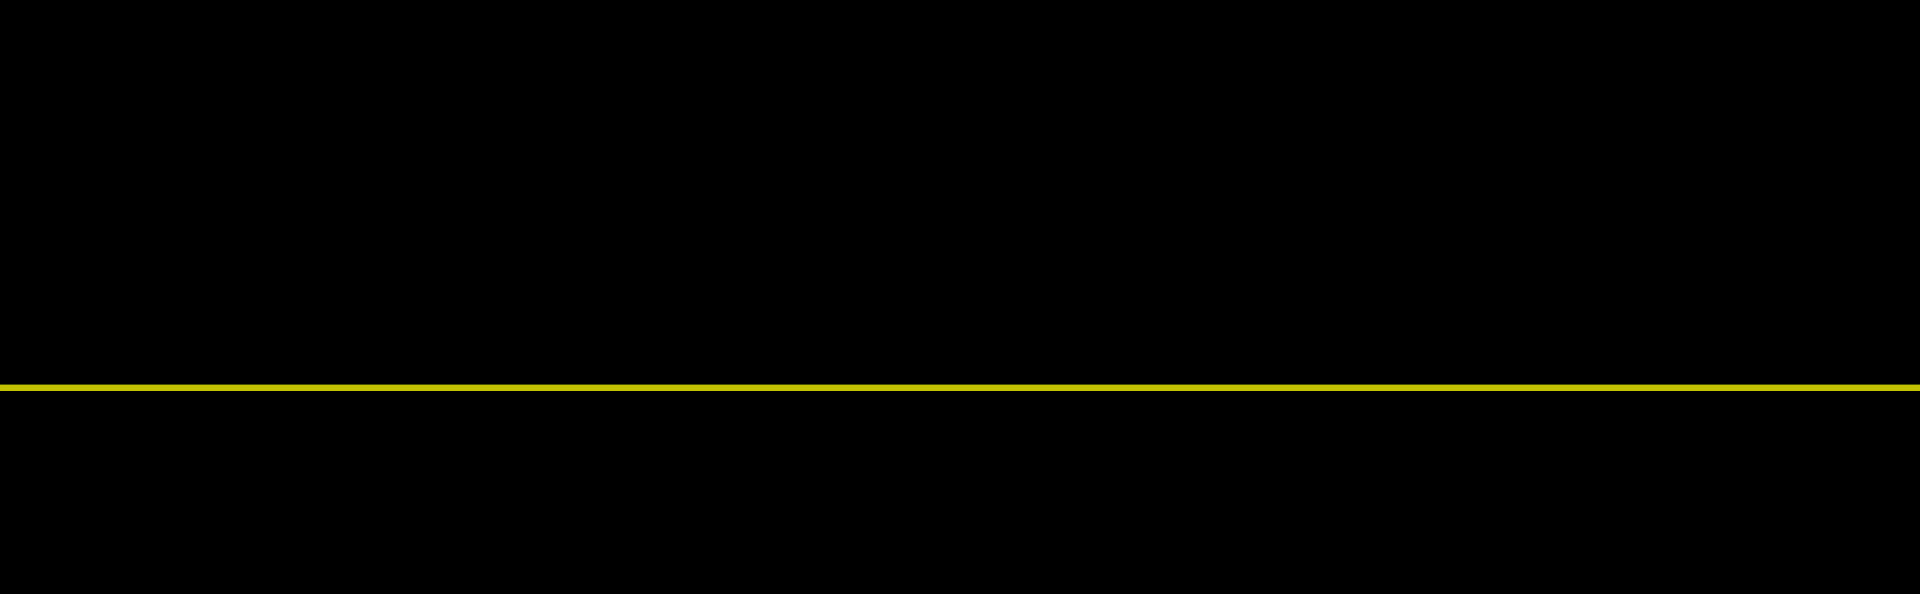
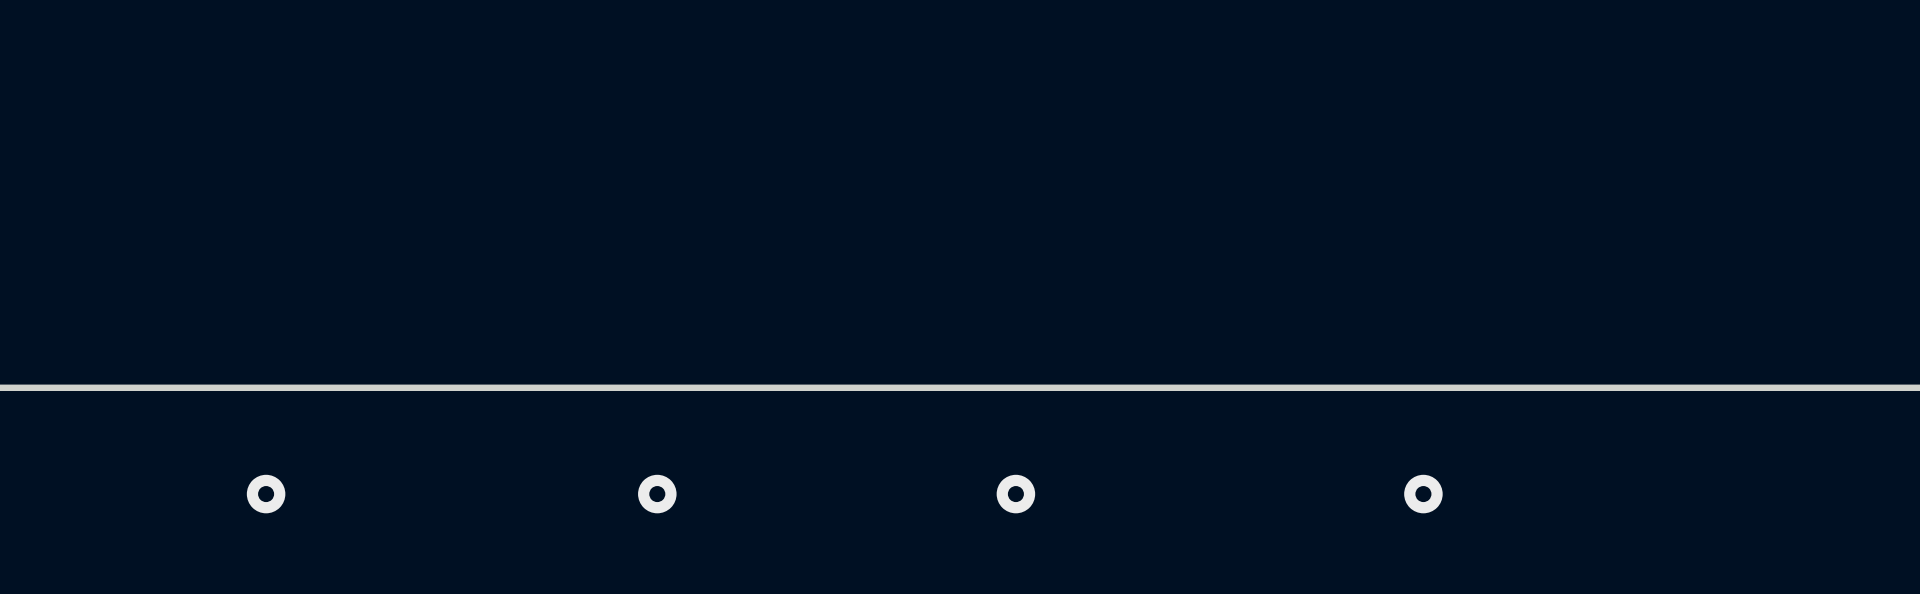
via: none -> (266, 494)
via: none -> (657, 494)
via: none -> (1015, 494)
via: none -> (1423, 494)

